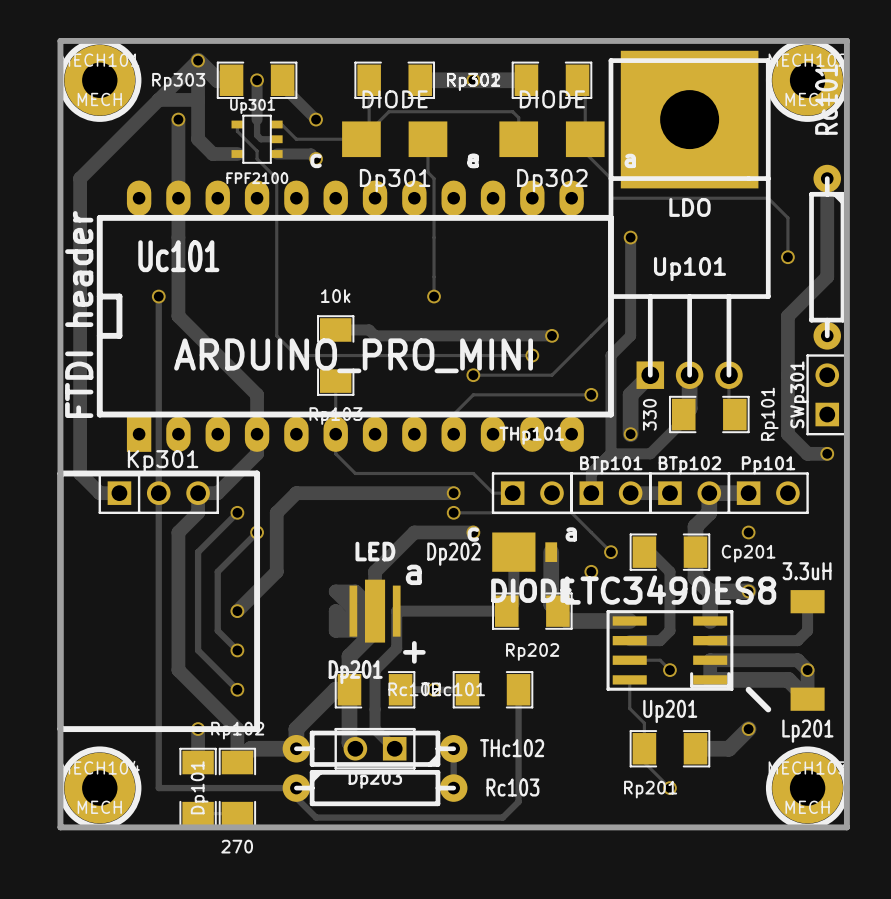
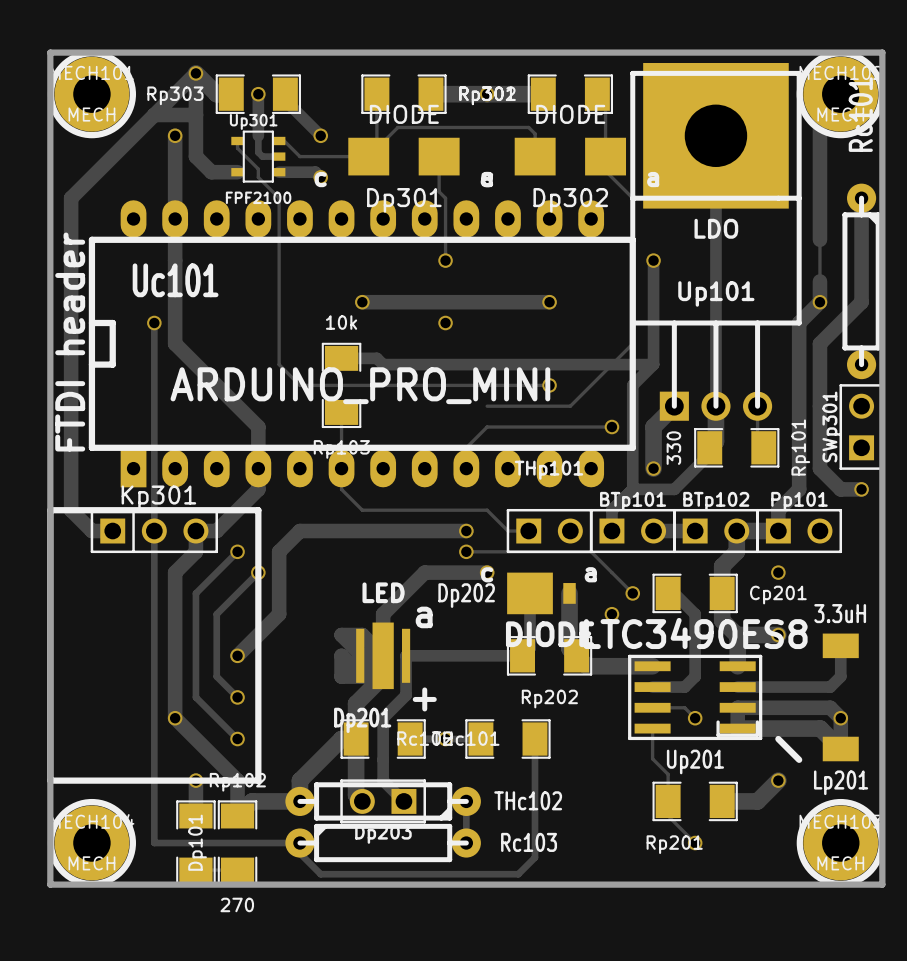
track: none -> (715, 135) (715, 406)
track: (610, 198) (768, 198) (787, 217) -> (840, 94) (819, 115) (819, 239)
track: (434, 237) (434, 296) -> none
via: none -> (445, 260)
track: none -> (819, 281) (819, 302) (799, 323) (799, 489) (778, 510) (778, 531)
via position: (787, 257) -> (819, 302)
track: none -> (362, 302) (549, 302)
via: none -> (362, 302)
via: none -> (549, 302)
track: none -> (570, 364) (653, 364)
via: (551, 335) -> none
via: (473, 375) -> none
via: none -> (175, 718)

